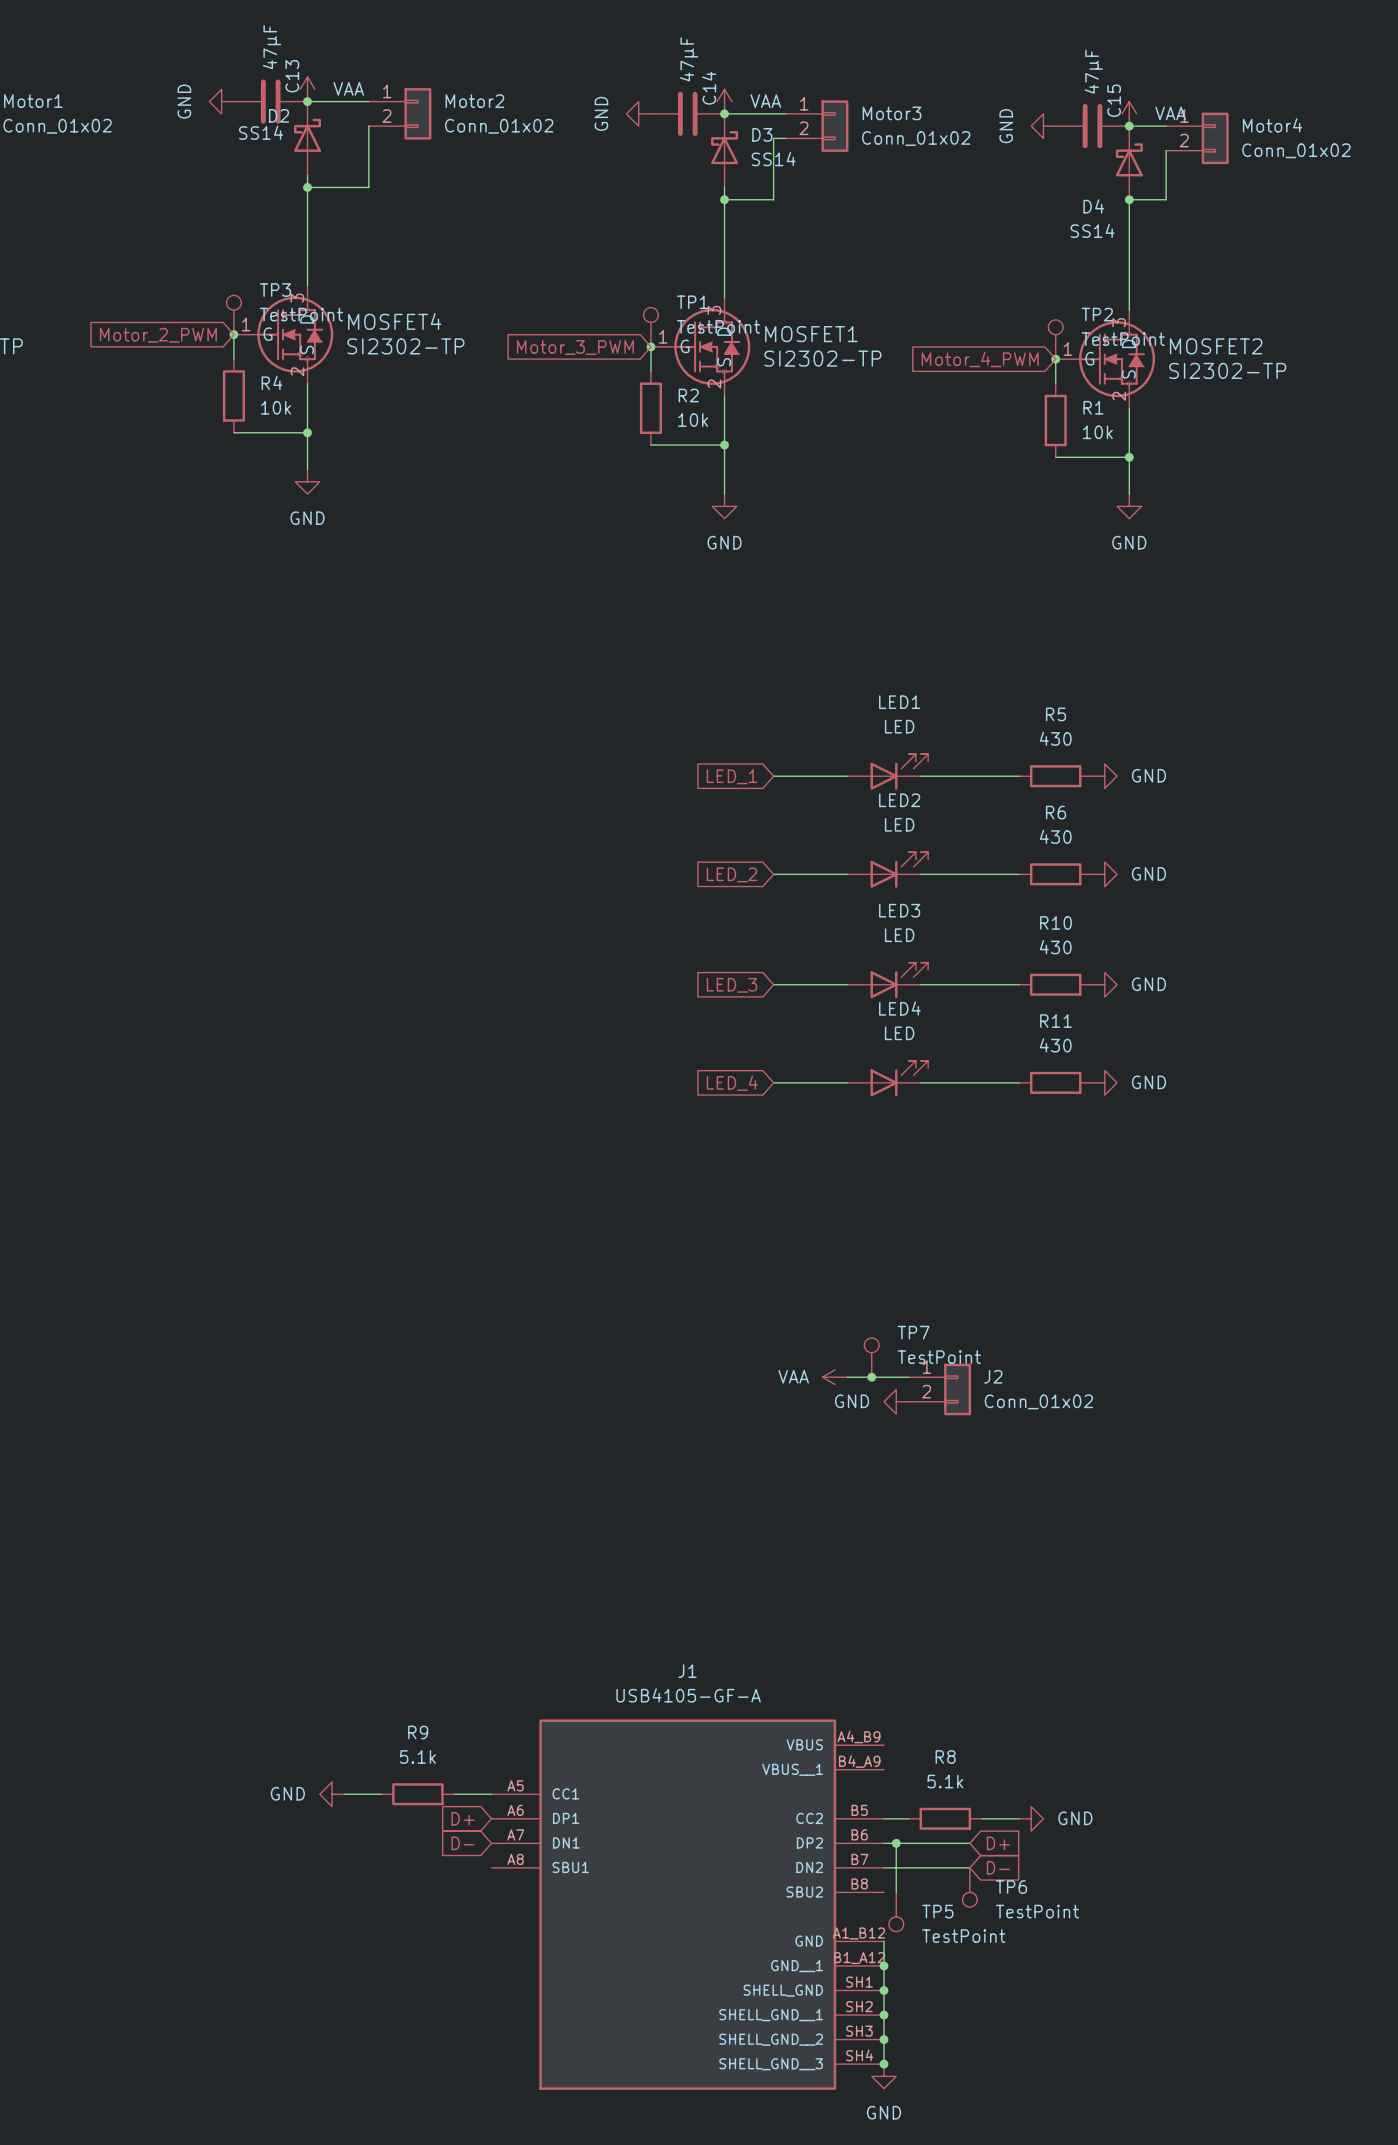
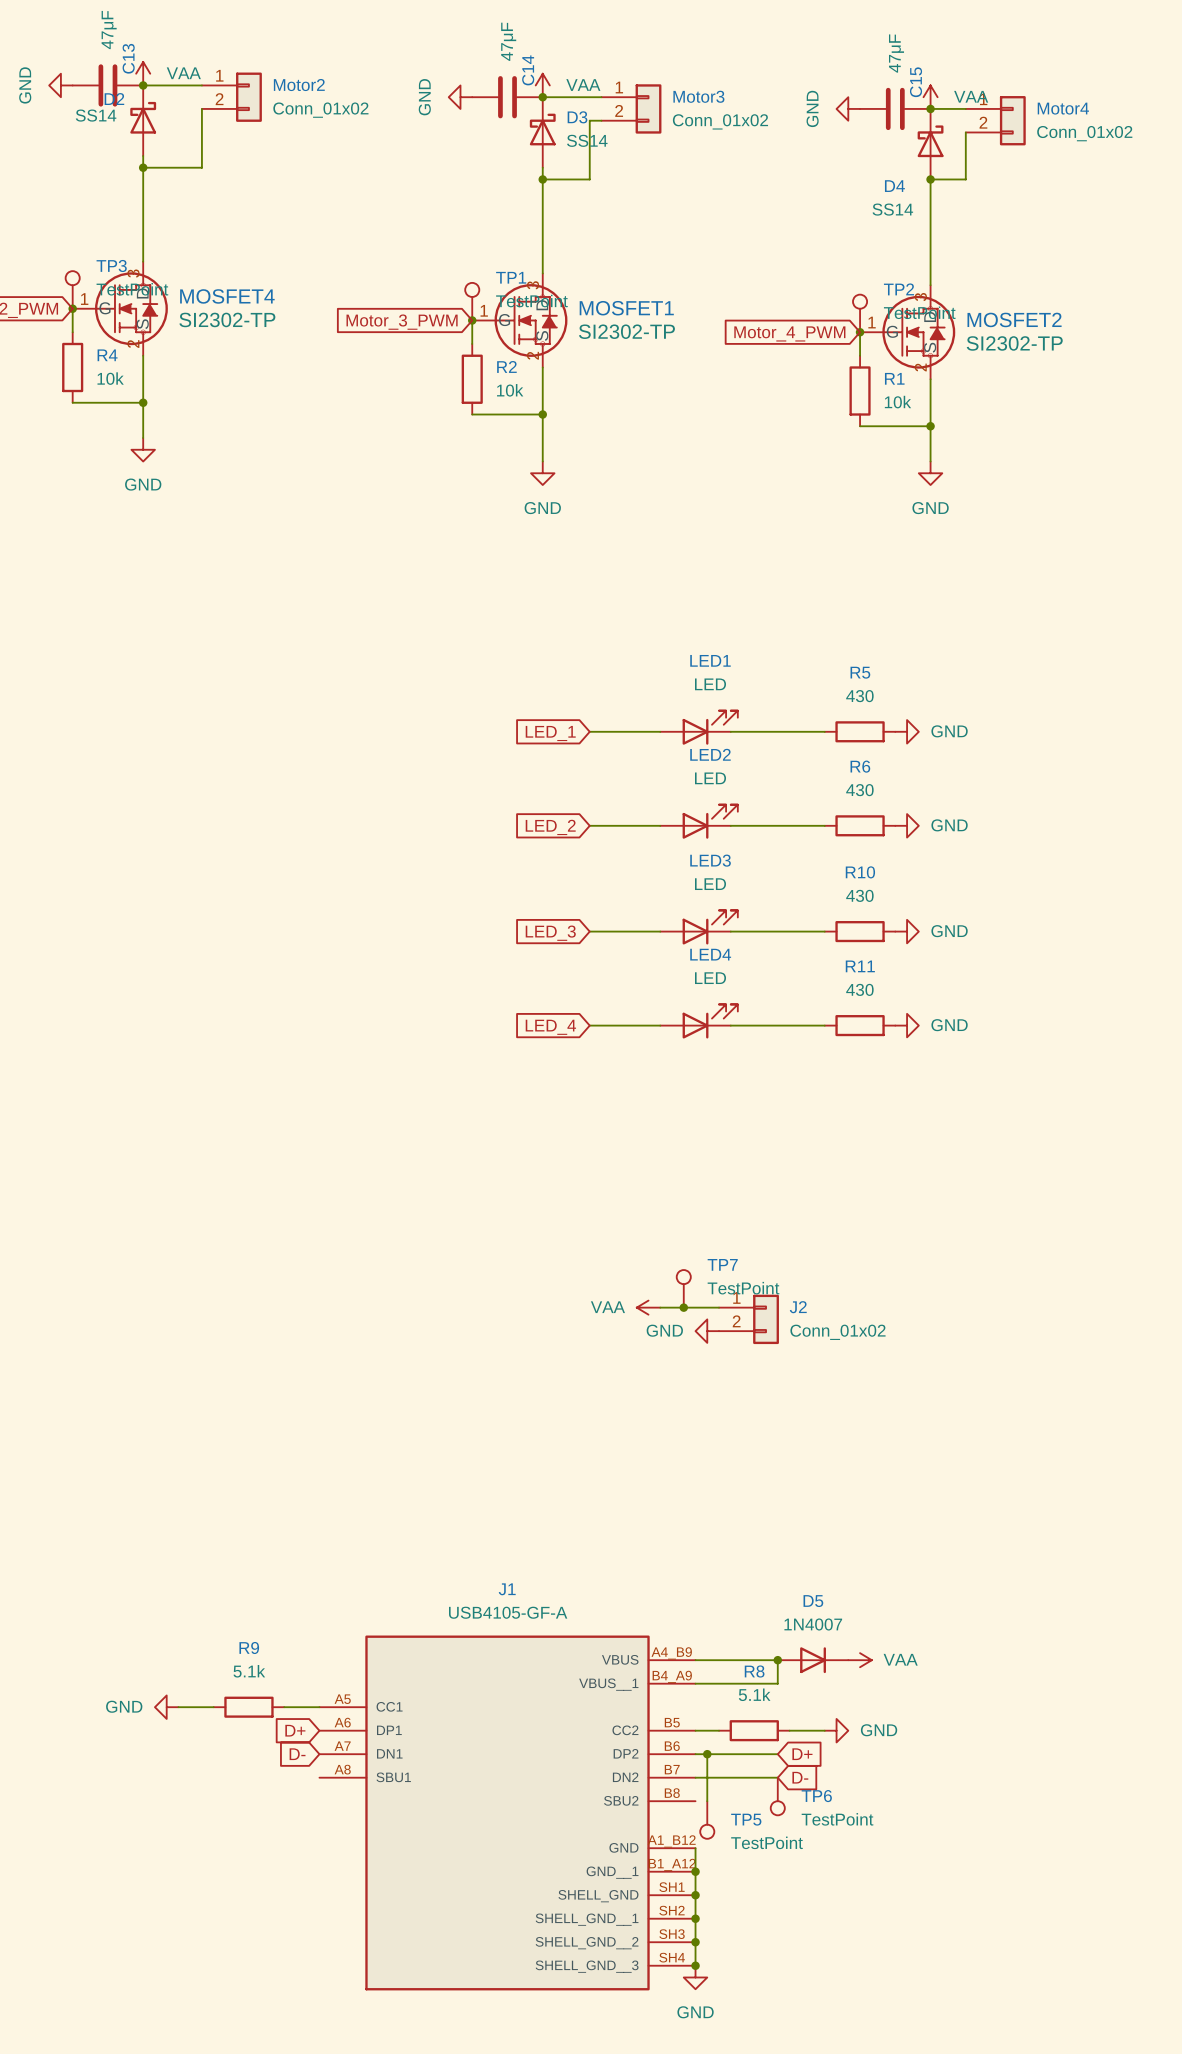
wire: none -> (695, 1660) (777, 1660) (777, 1683) (695, 1683)
junction: none -> (777, 1660)
D5: none -> 1N4007 (813, 1660)
power symbol: none -> VAA (860, 1660)

